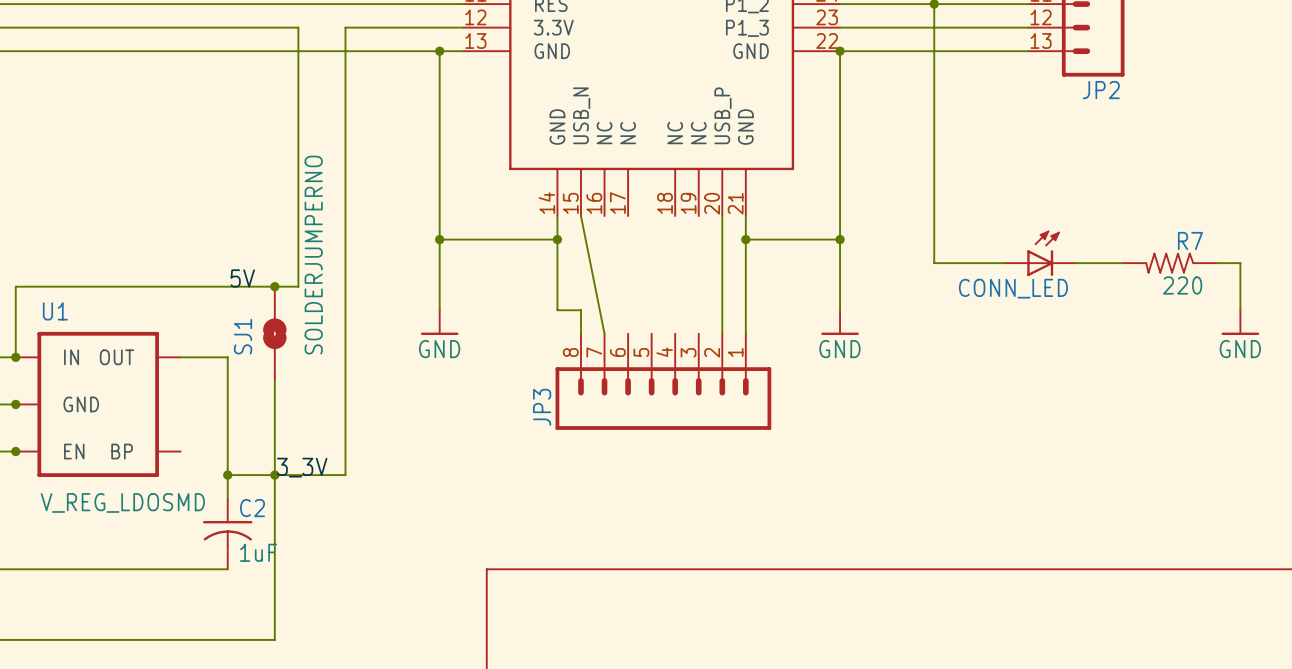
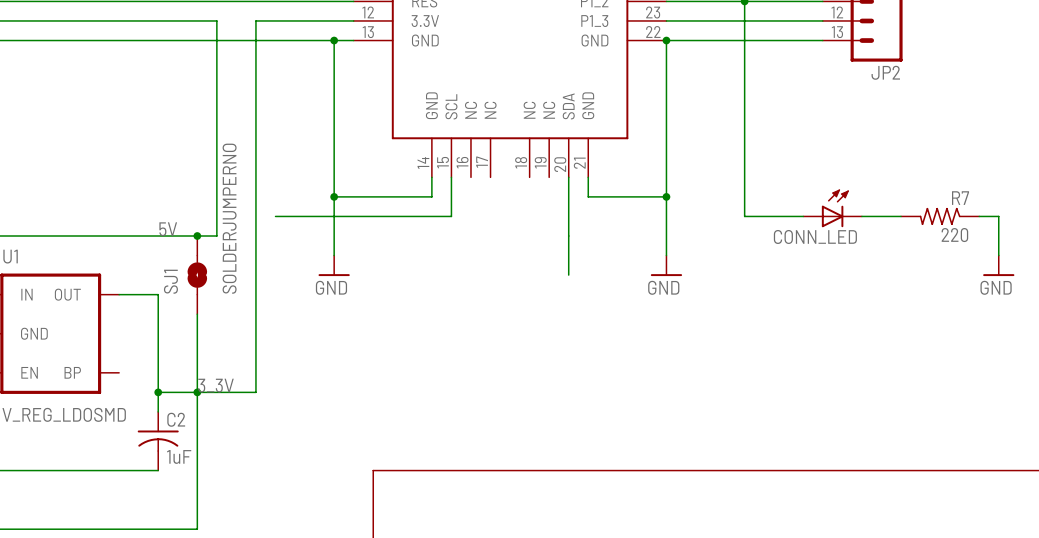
part pin name: USB_N (581, 115) -> SCL (451, 106)
part pin name: USB_P (722, 115) -> SDA (568, 106)
wire: (580, 216) (604, 333) -> (451, 177) (451, 216) (275, 216)
wire: (557, 239) (557, 310) (580, 310) (580, 333) -> none
junction: (557, 239) -> none
wire: (745, 239) (745, 333) -> none
junction: (745, 239) -> none
JP3: (663, 381) -> none

